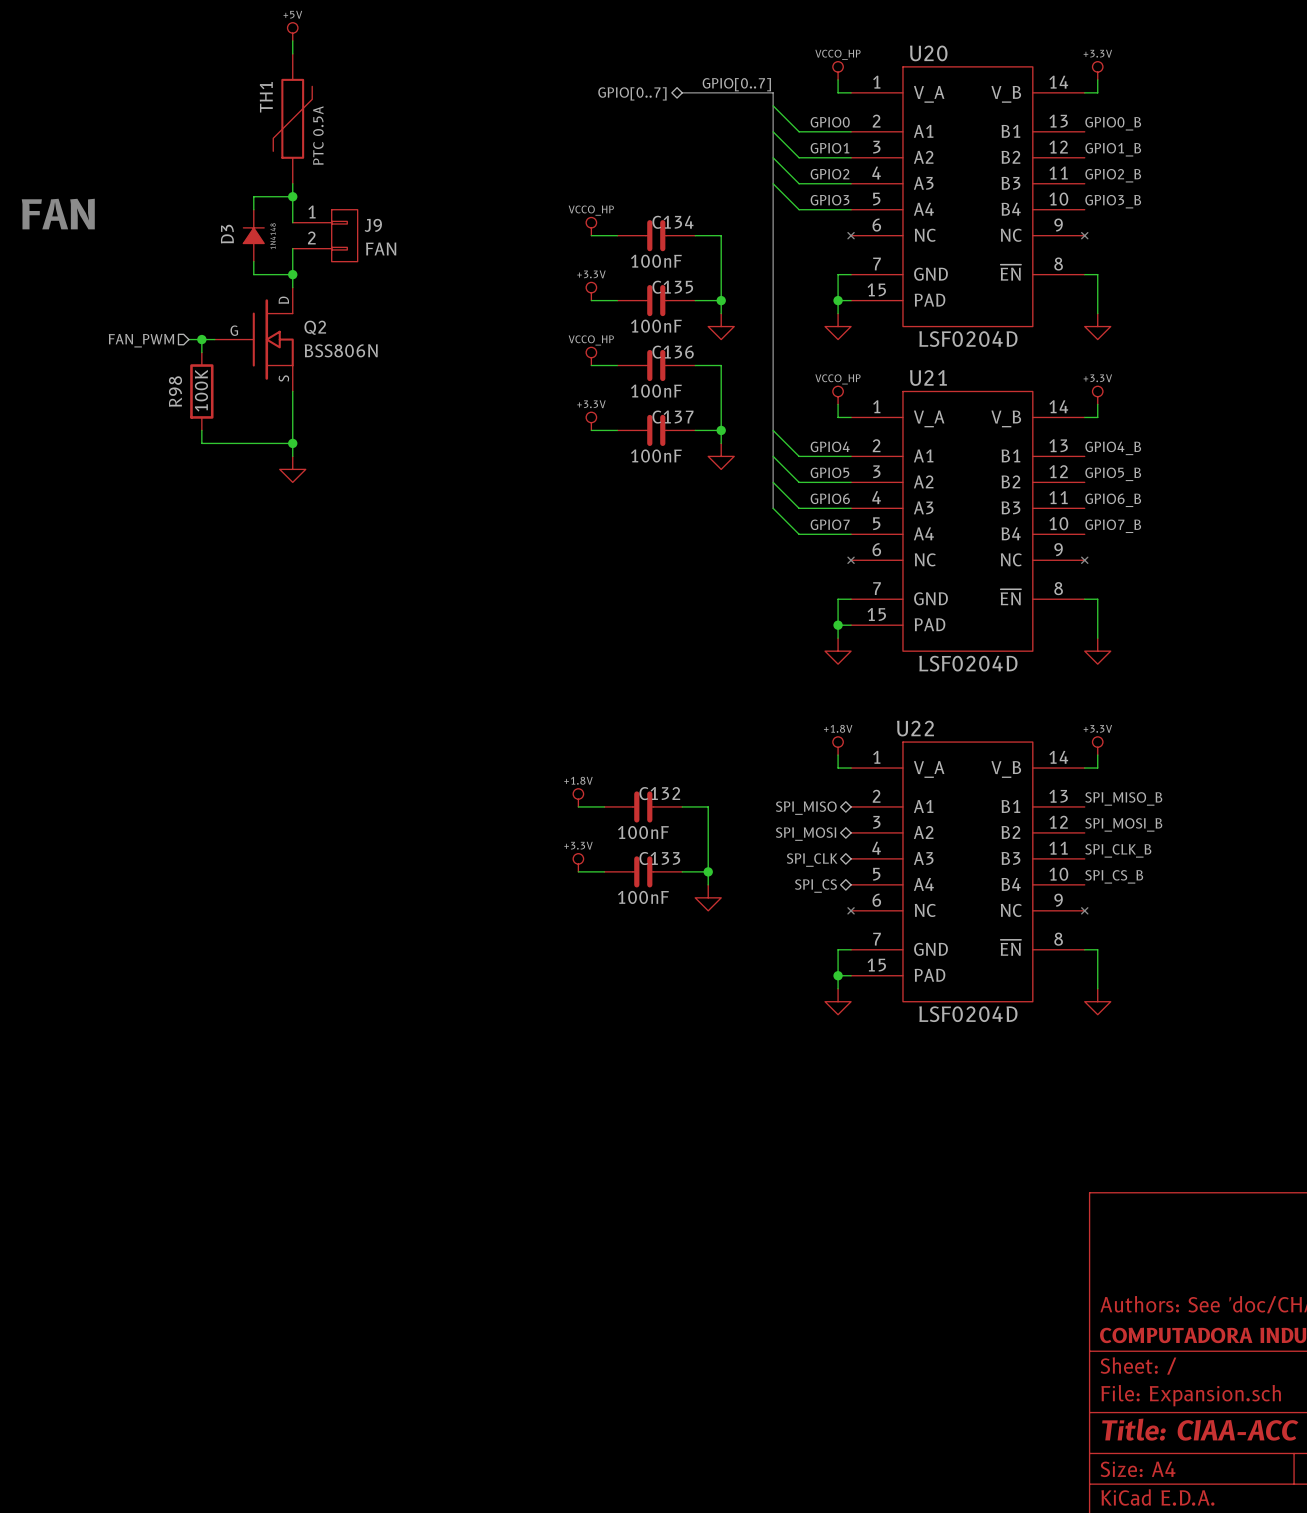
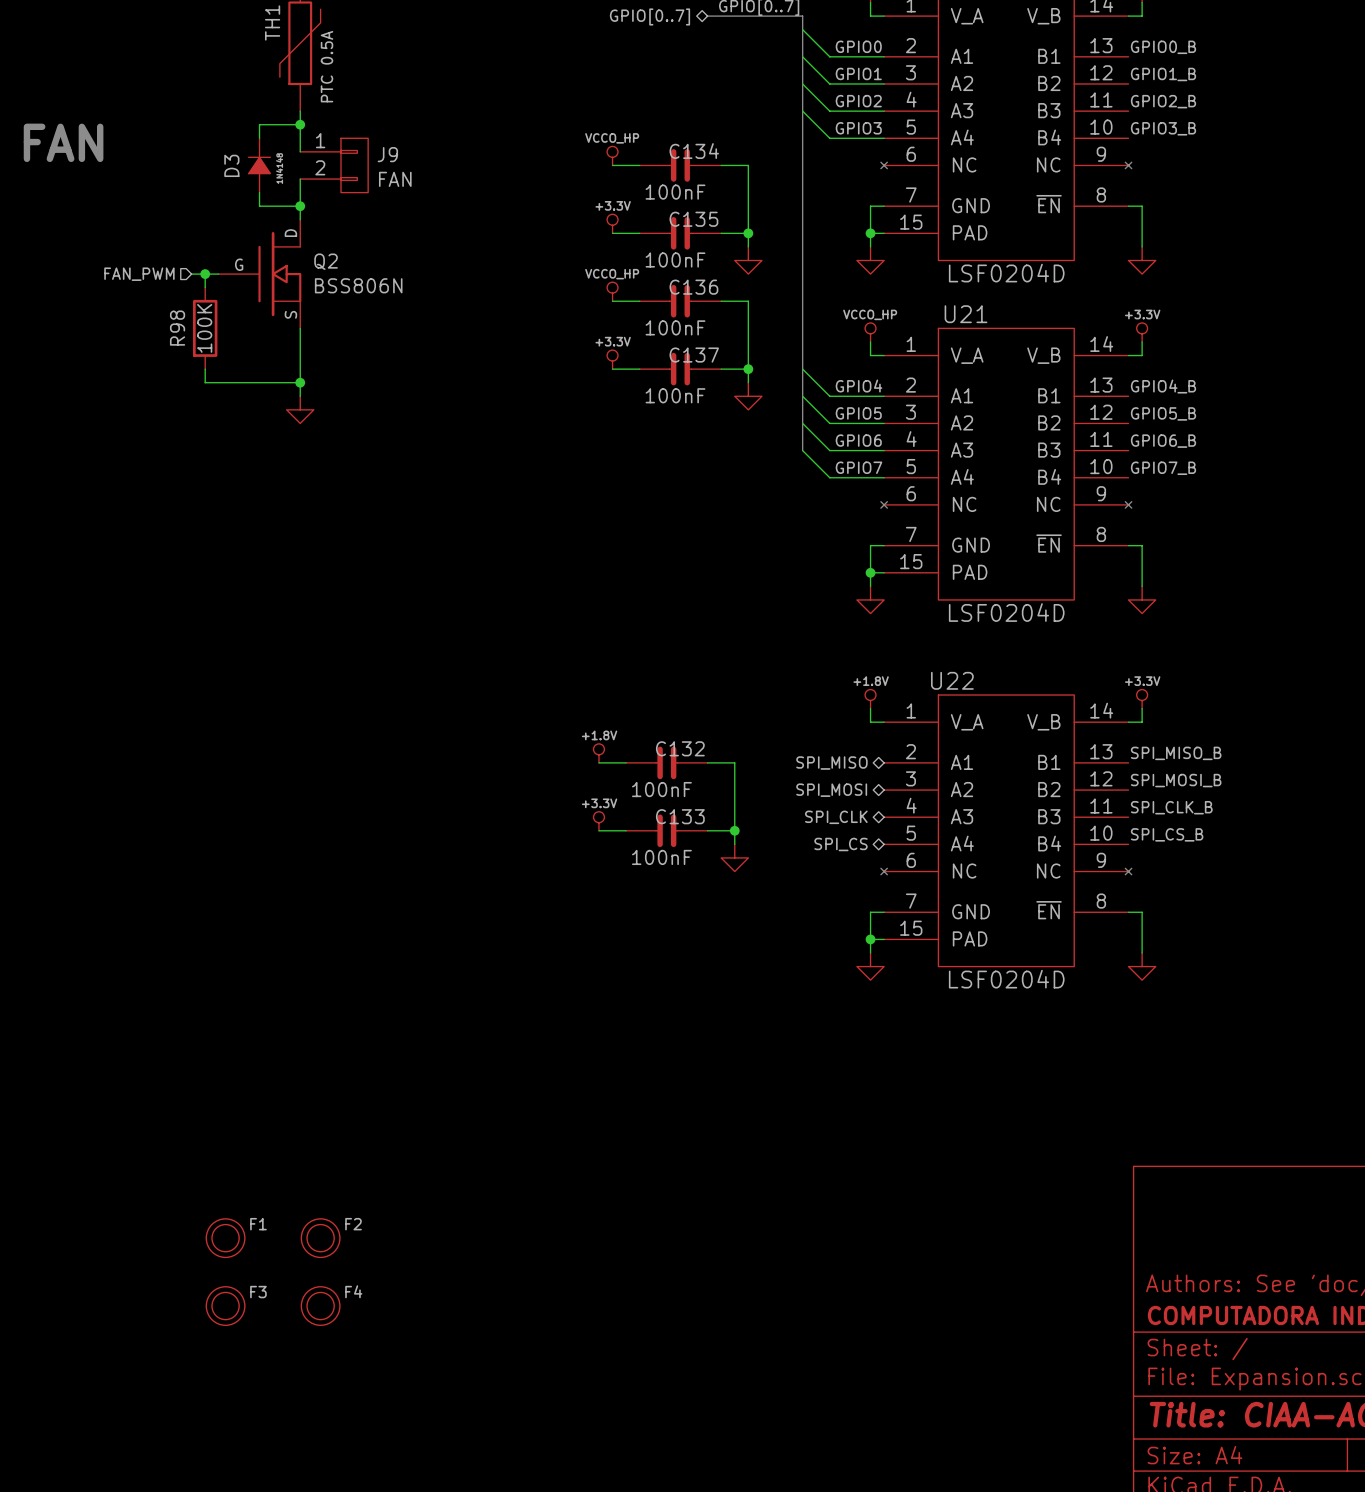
F1: none -> (225, 1238)
F2: none -> (320, 1238)
F3: none -> (225, 1306)
F4: none -> (320, 1306)

